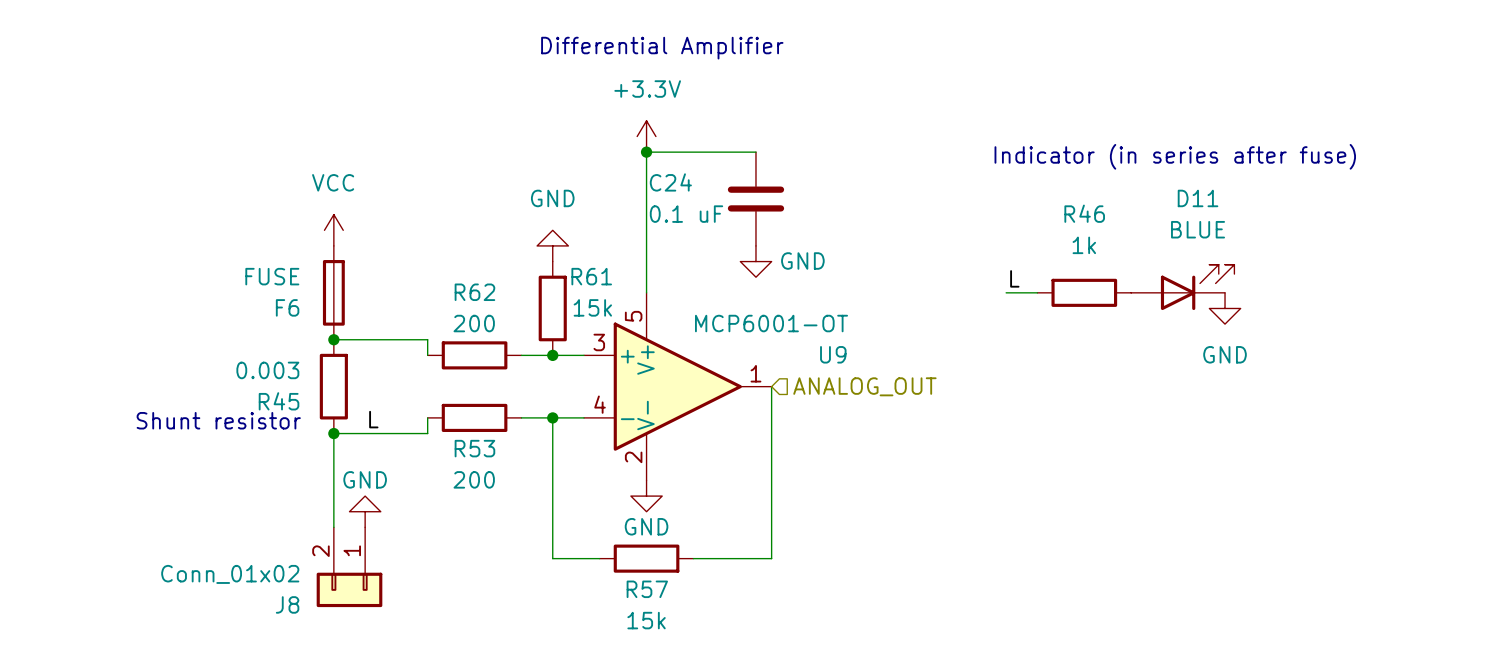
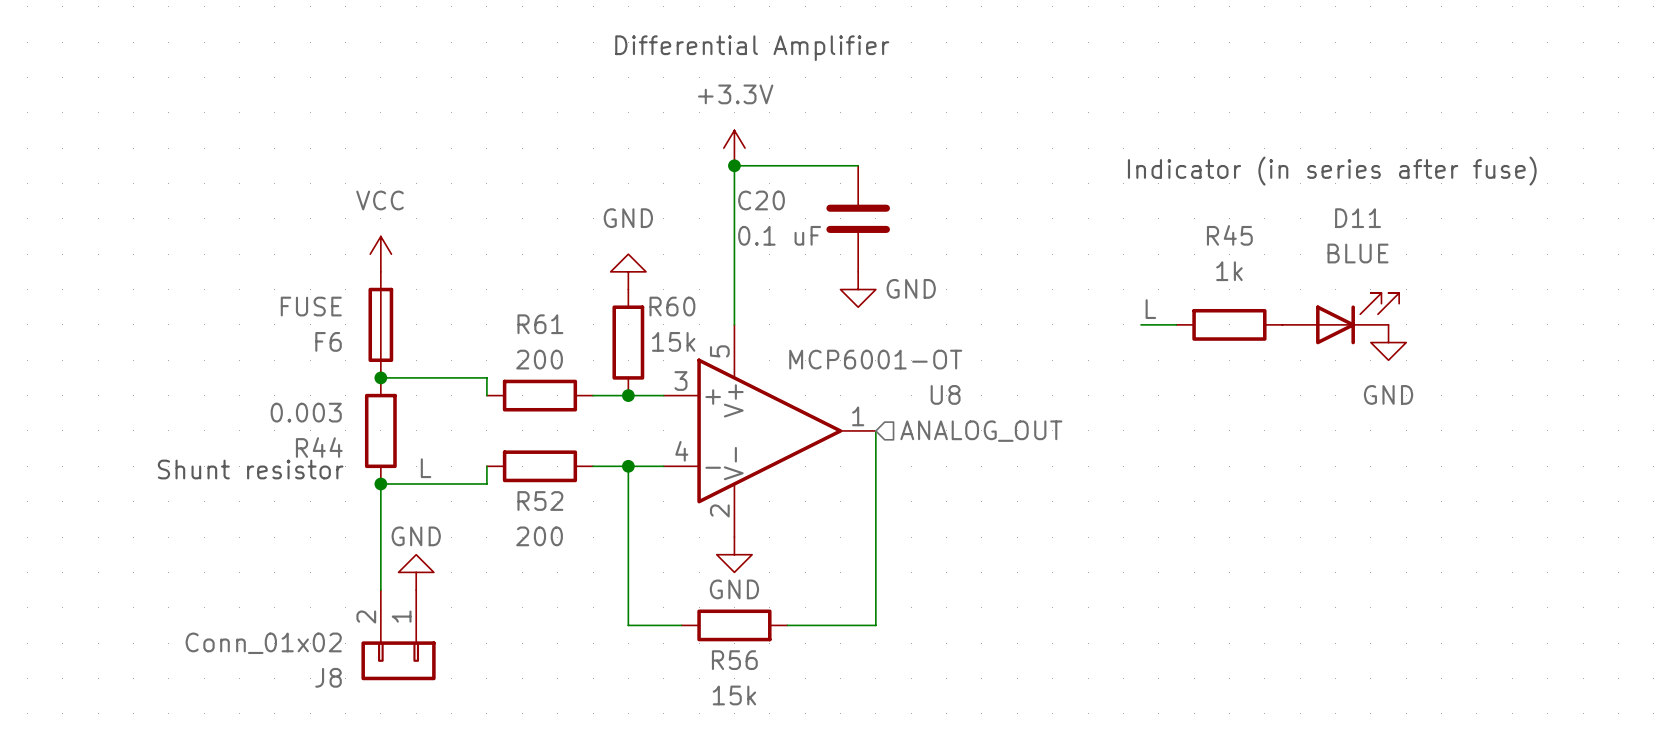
C24 name: C24 (670, 182) -> C20 (761, 200)
R46 name: R46 (1084, 213) -> R45 (1229, 235)
R61 name: R61 (591, 276) -> R60 (672, 306)
R62 name: R62 (474, 292) -> R61 (540, 324)
U9 name: U9 (833, 354) -> U8 (945, 394)
R45 name: R45 (279, 401) -> R44 (319, 447)
R53 name: R53 (474, 448) -> R52 (540, 501)
R57 name: R57 (647, 589) -> R56 (734, 660)

